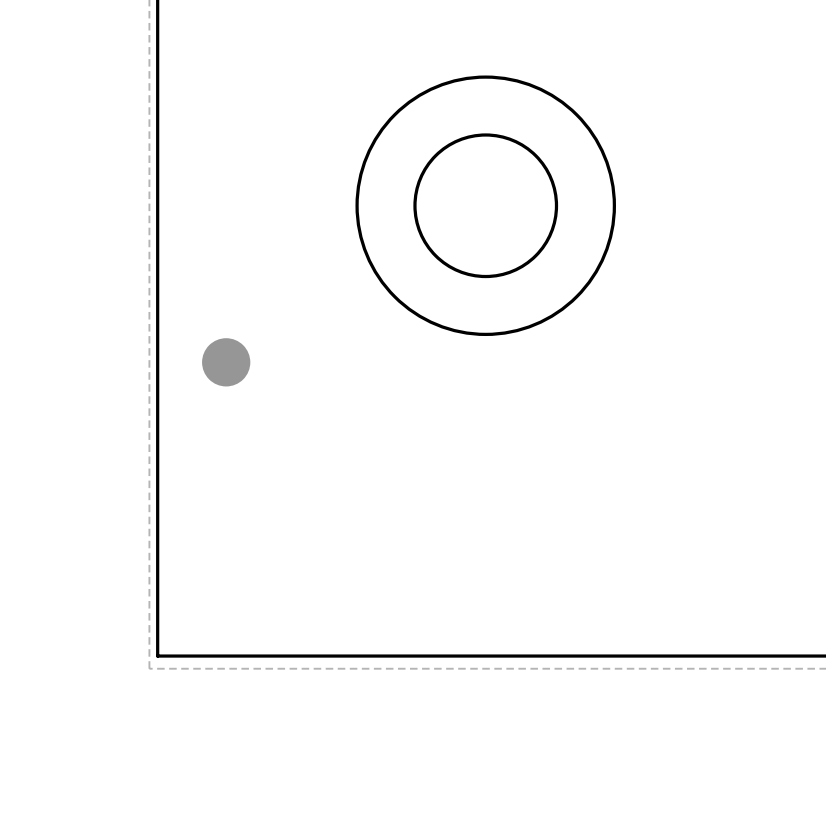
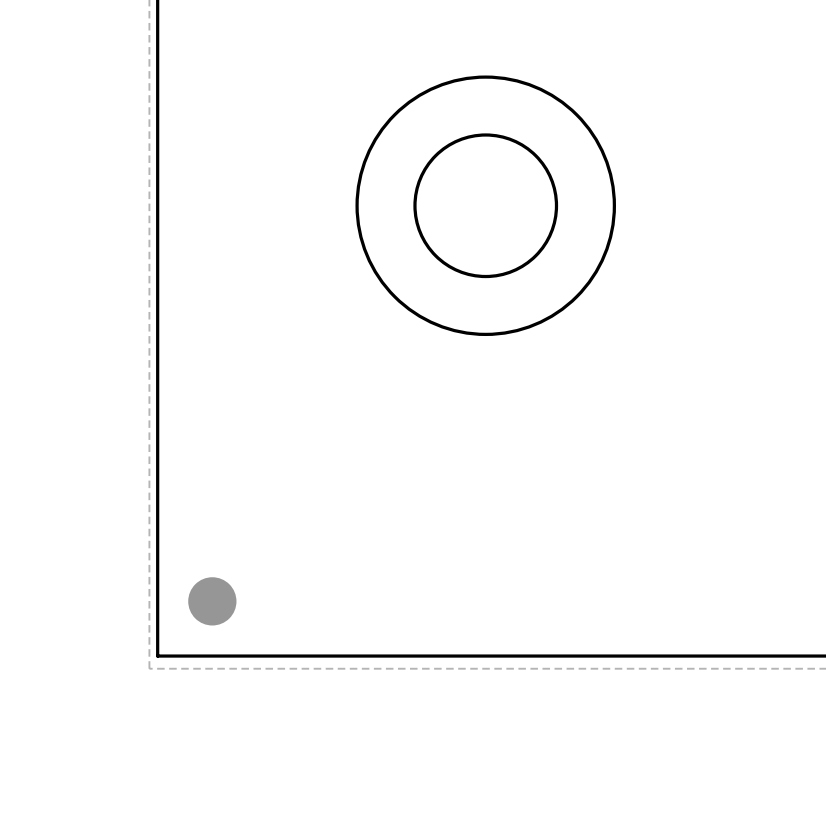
part position: (226, 362) -> (212, 601)

